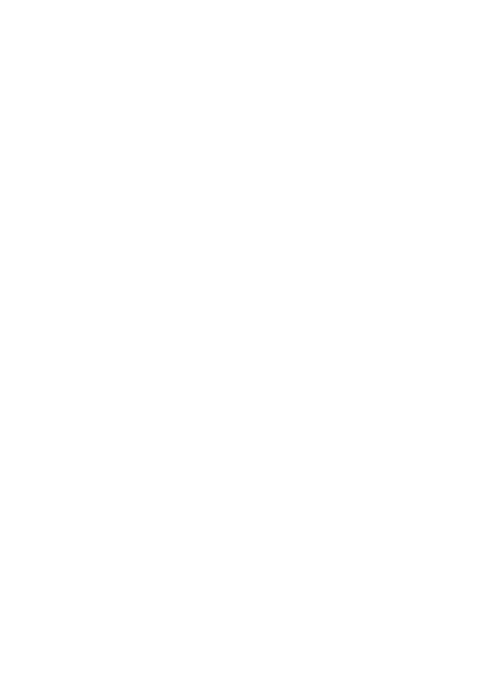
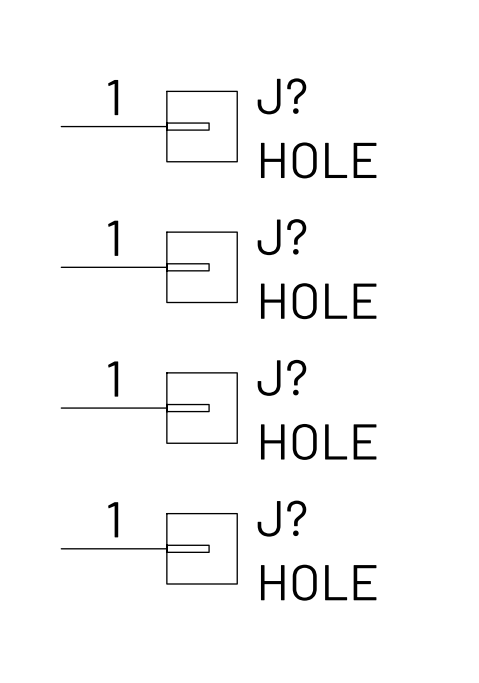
J?: none -> HOLE (149, 126)
J?: none -> HOLE (149, 267)
J?: none -> HOLE (149, 408)
J?: none -> HOLE (149, 548)

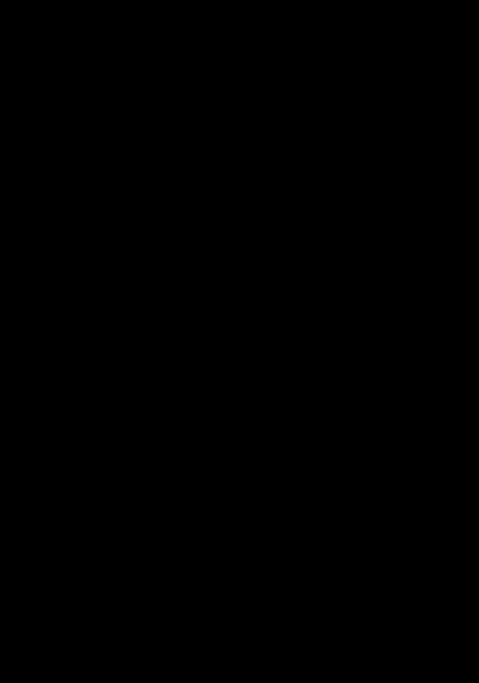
J?: HOLE (149, 126) -> none
J?: HOLE (149, 267) -> none
J?: HOLE (149, 408) -> none
J?: HOLE (149, 548) -> none

